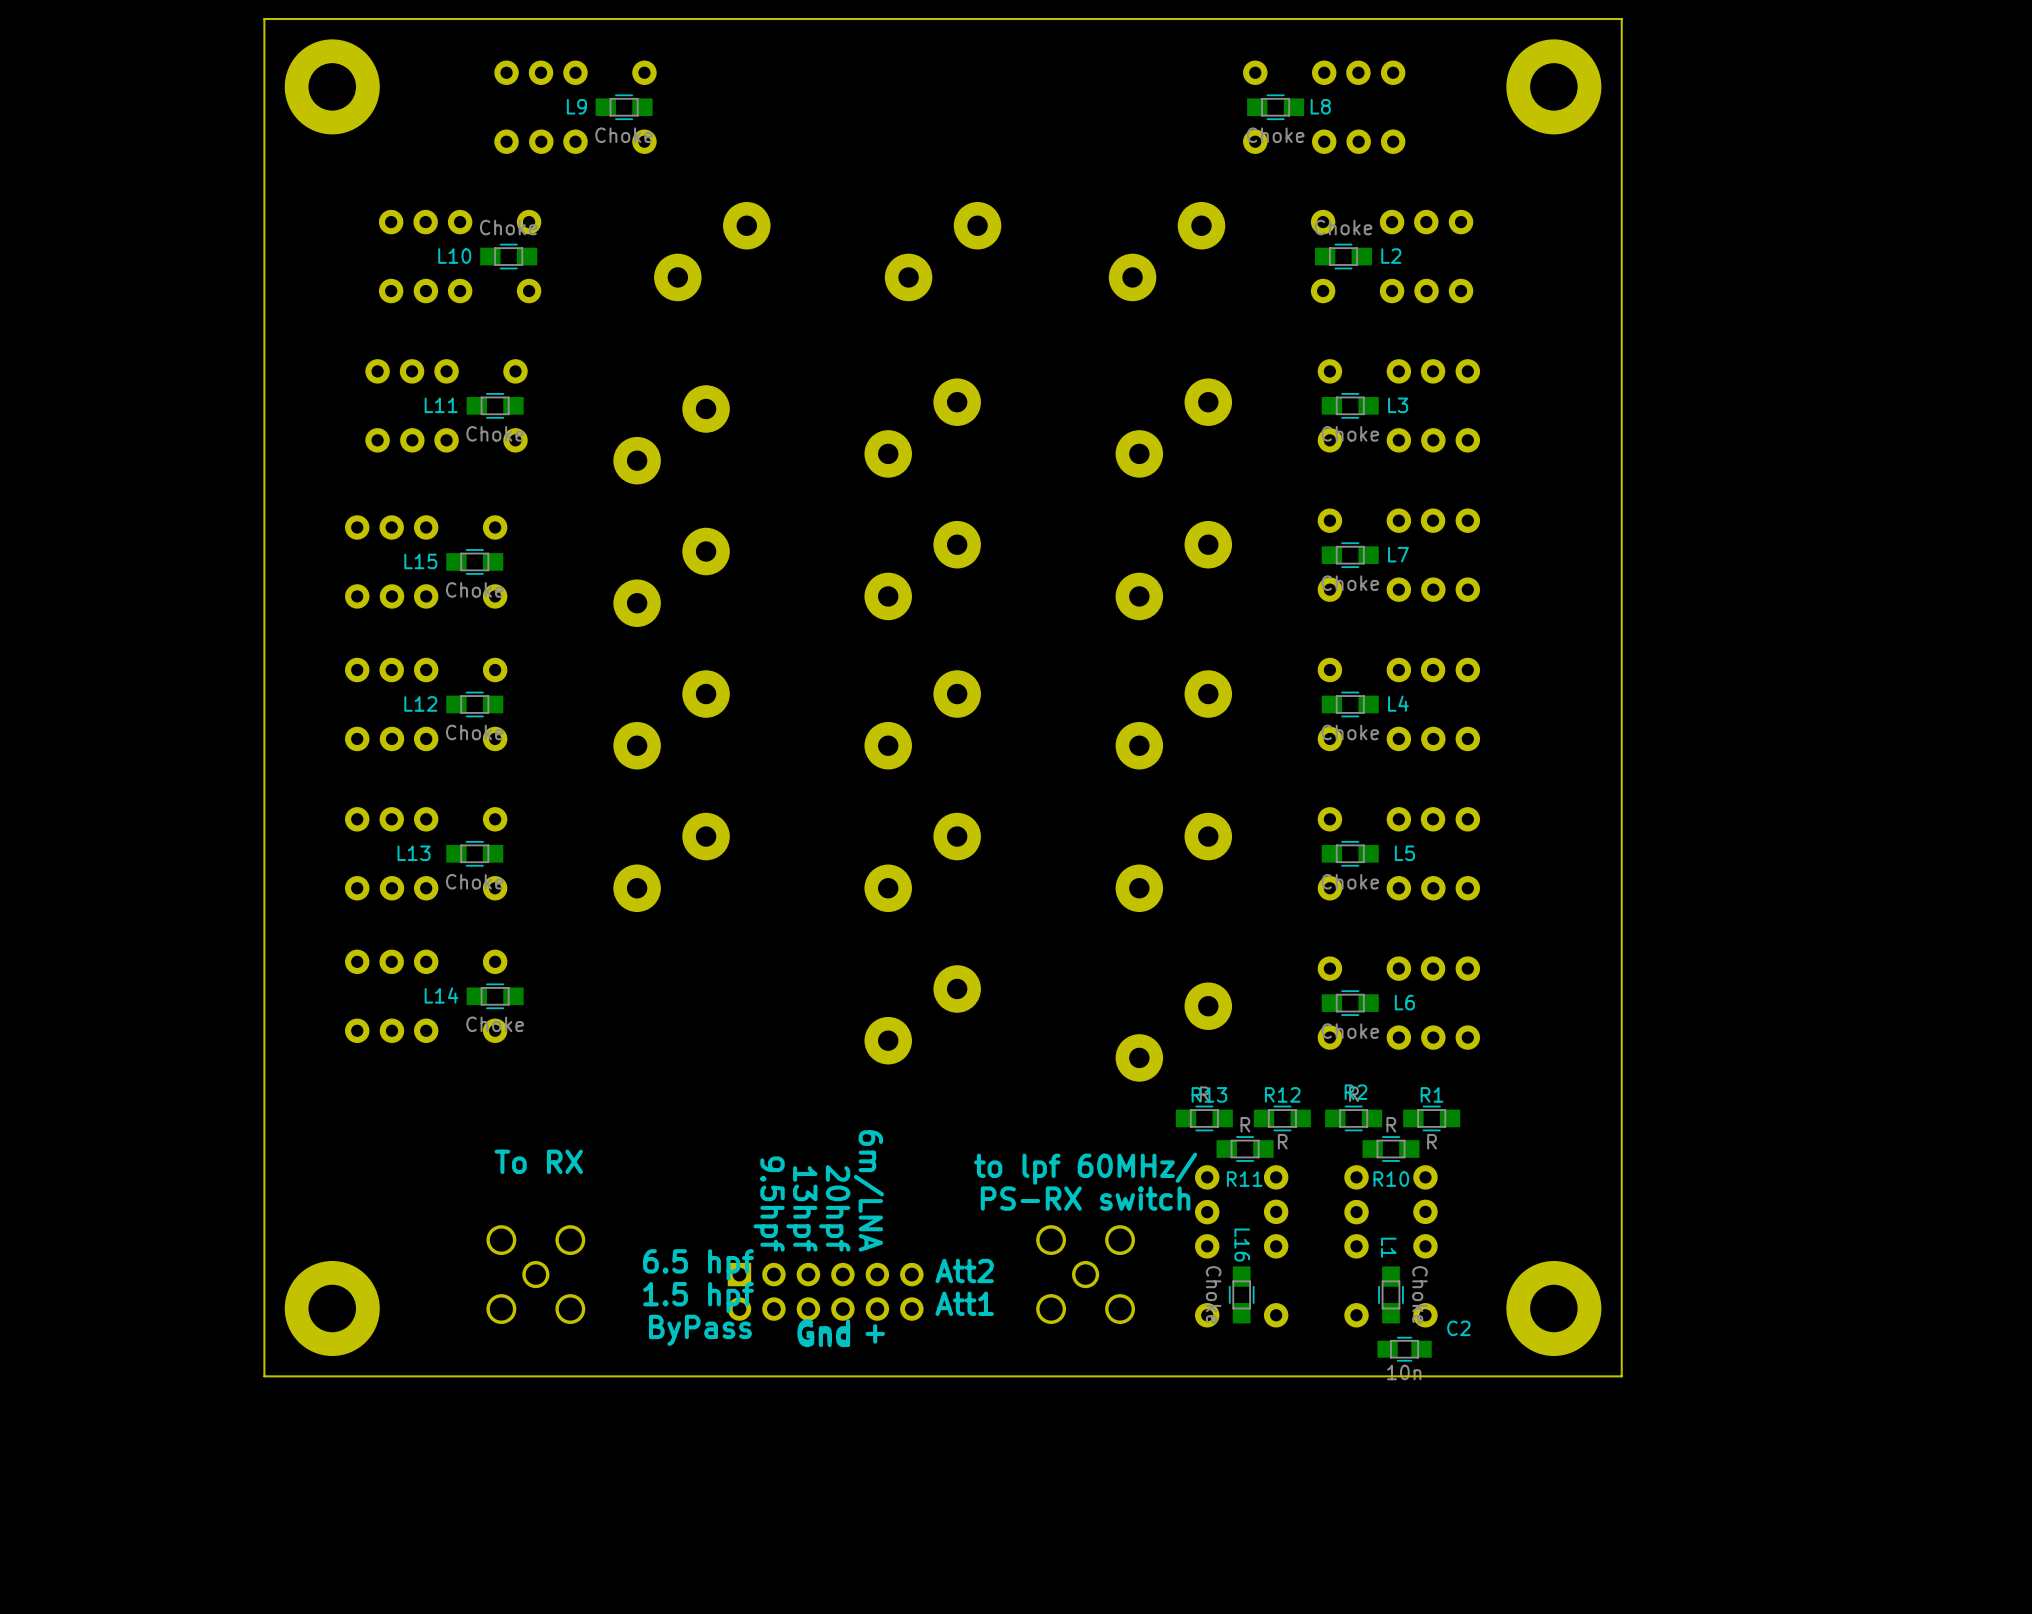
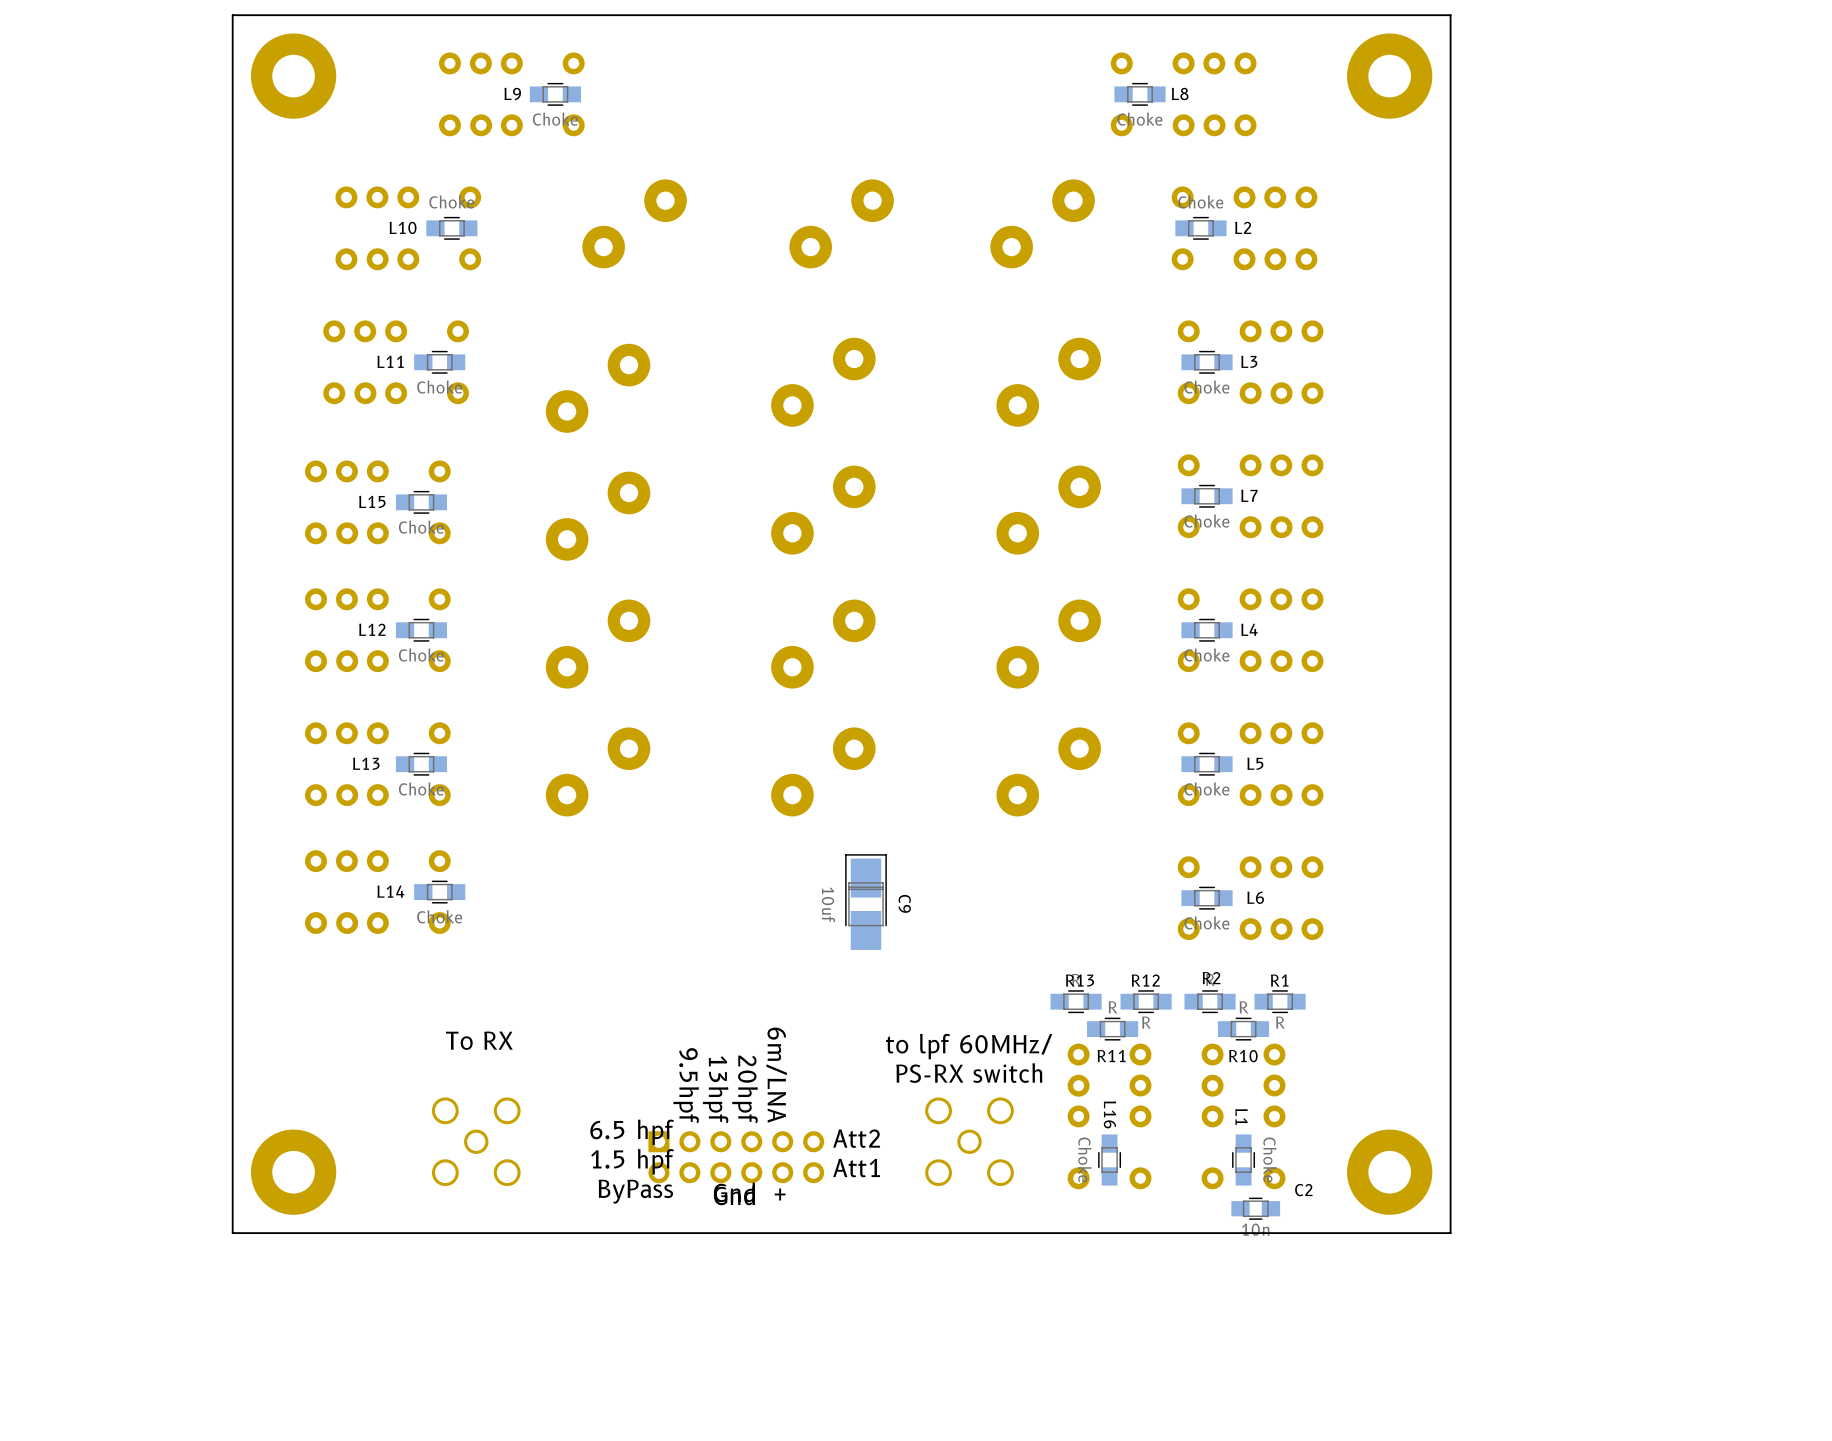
C9: none -> 10uf (865, 902)
part: (922, 1014) -> none
part: (1173, 1032) -> none

